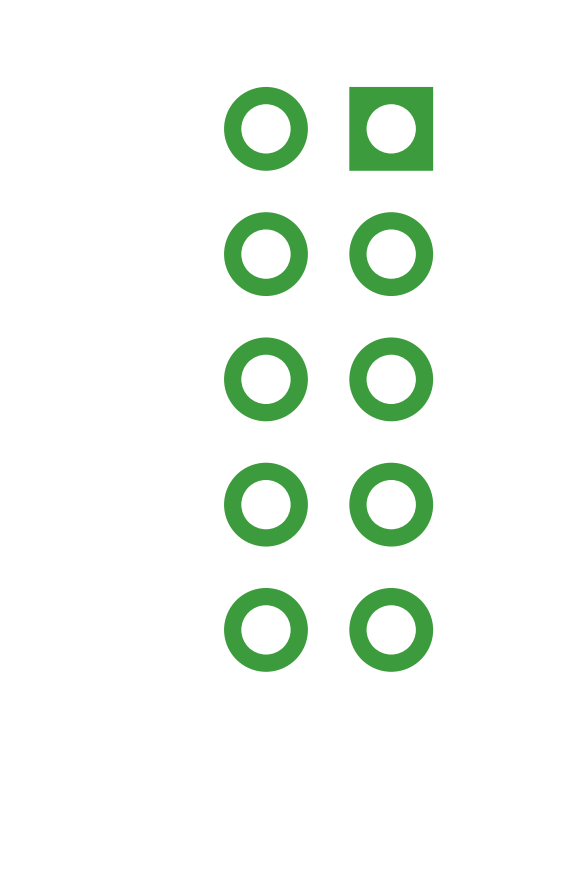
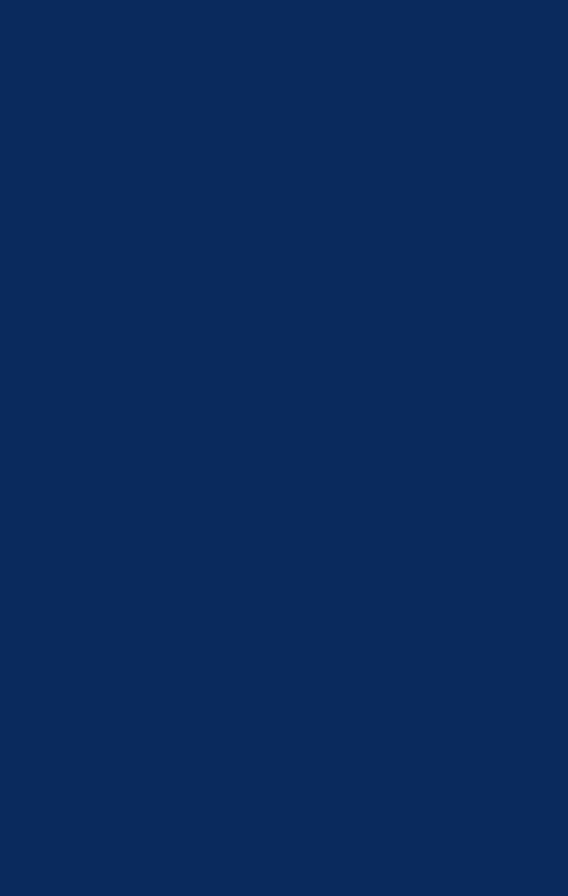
part: (328, 379) -> none

